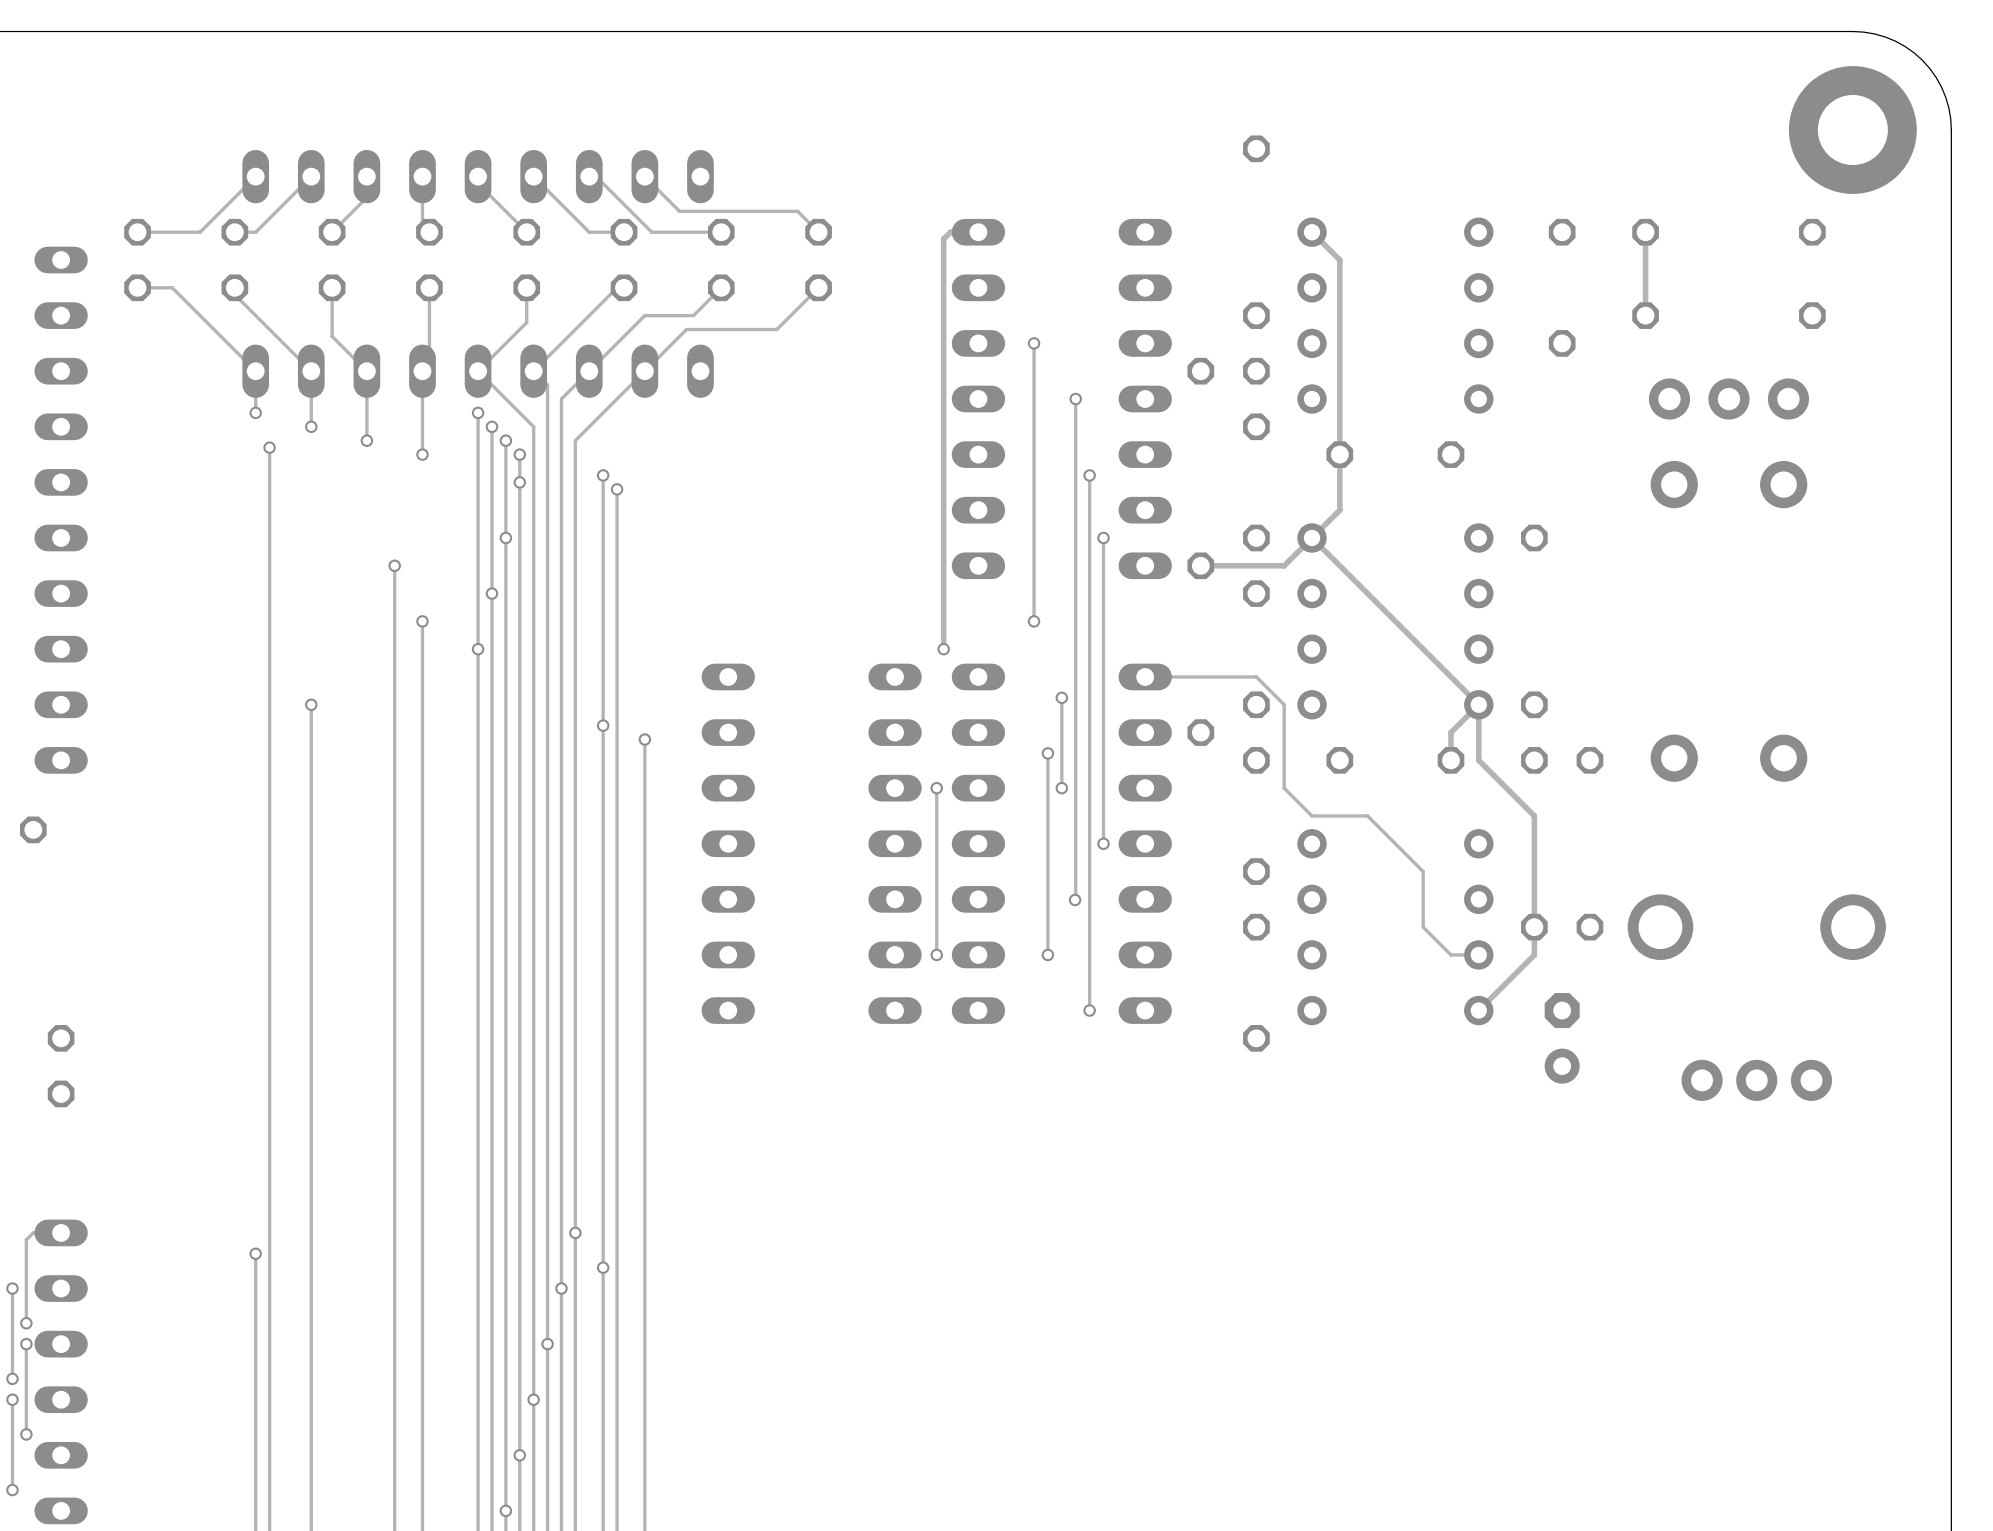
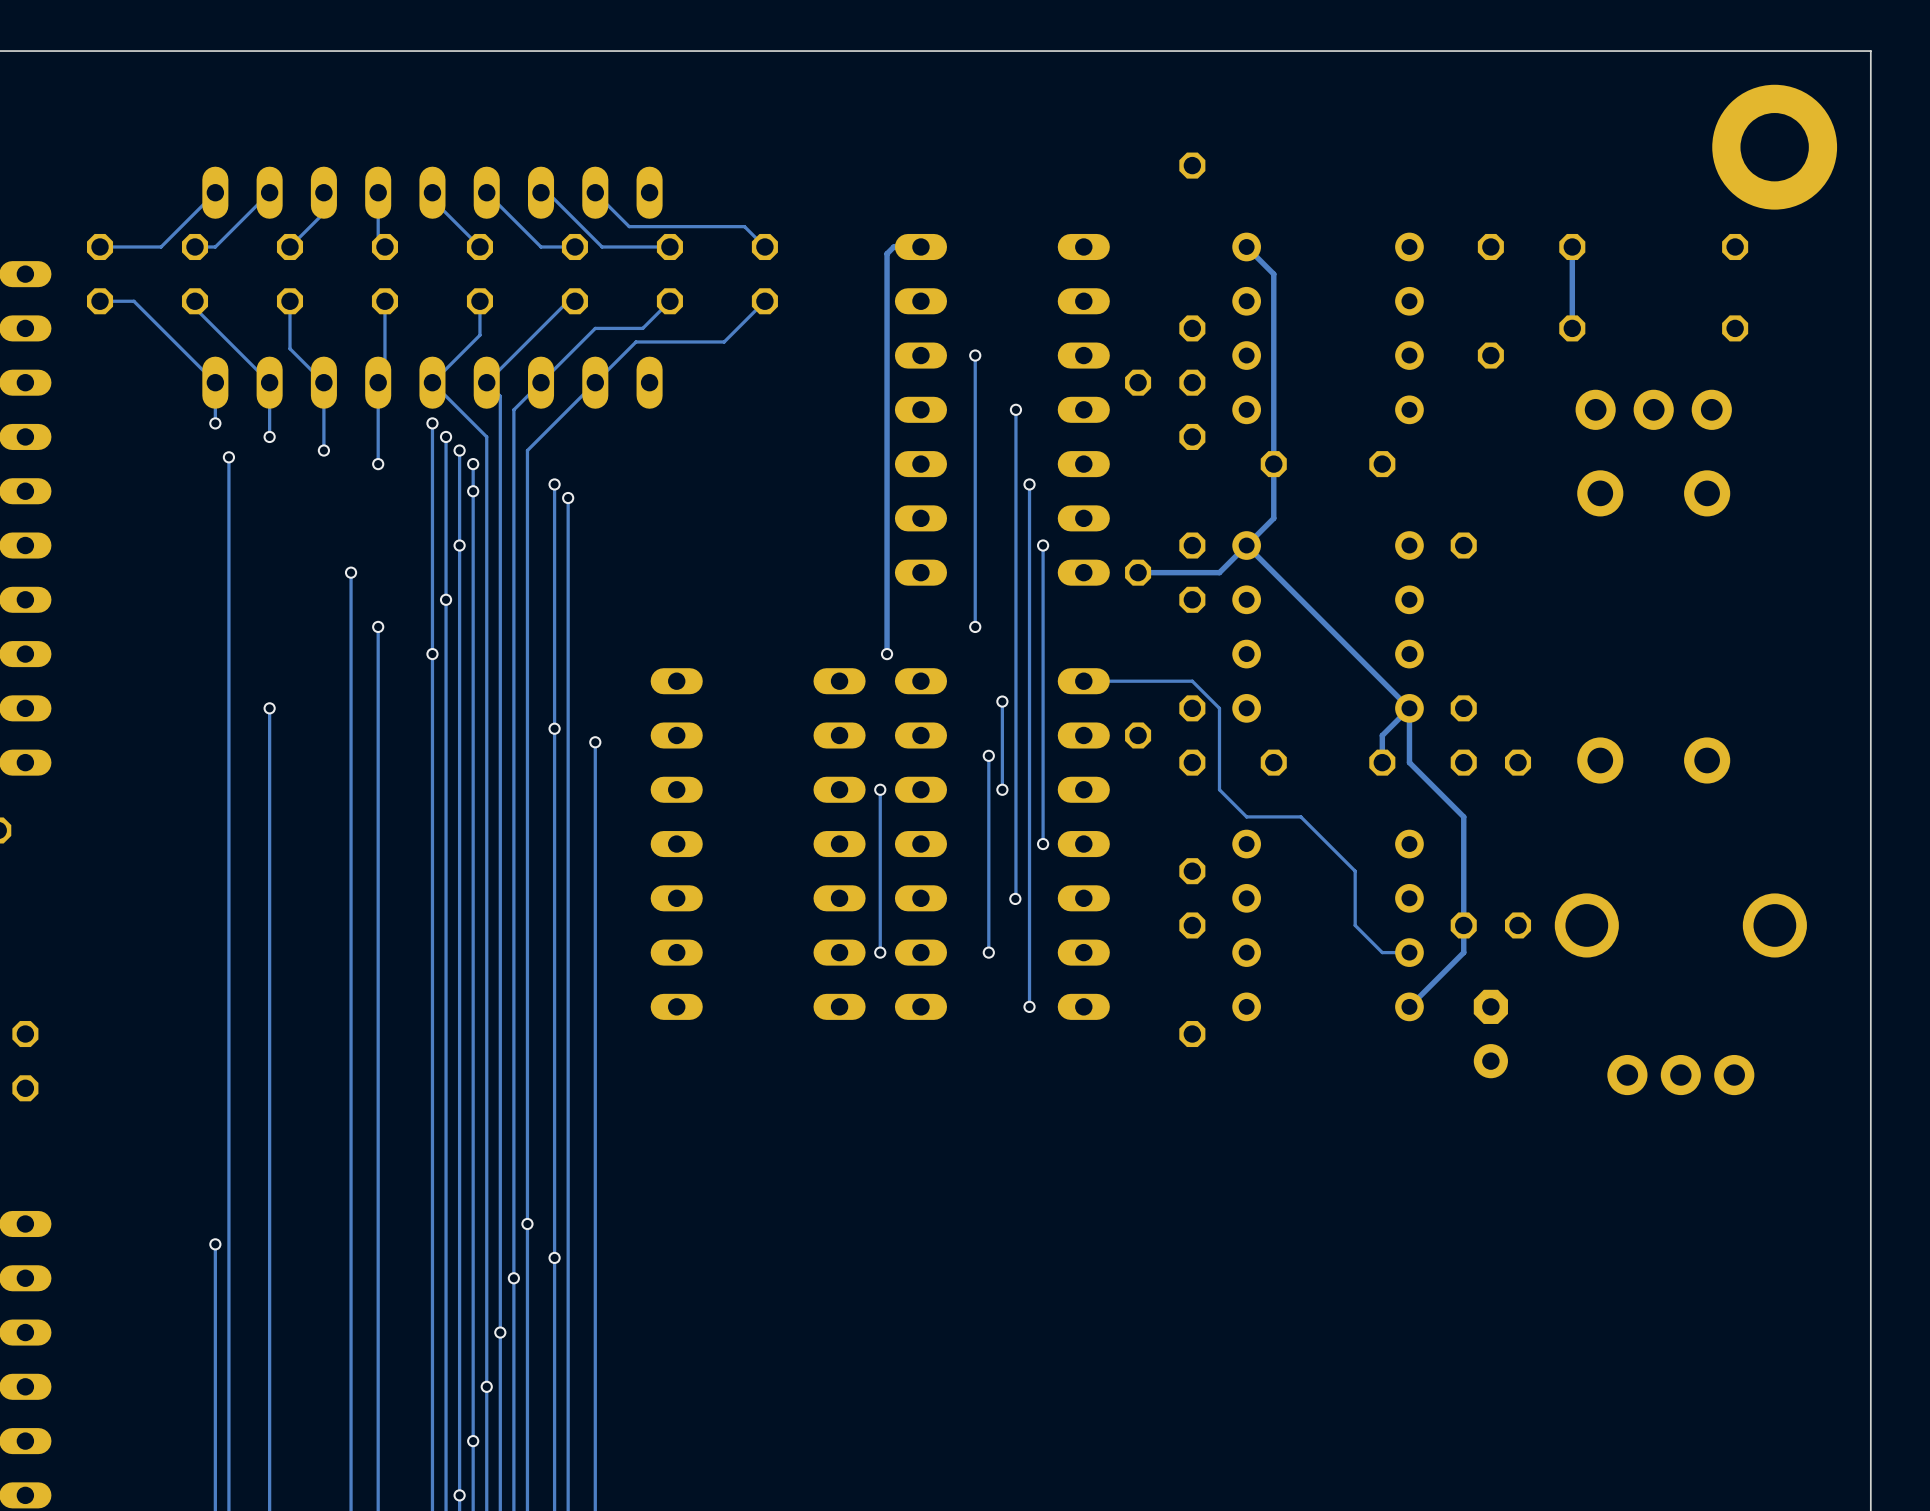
board edge: (1852, 31) (1874, 33) (1895, 41) (1922, 60) (1941, 87) (1948, 108) (1951, 130) -> (1774, 51) (1870, 51) (1870, 147)

